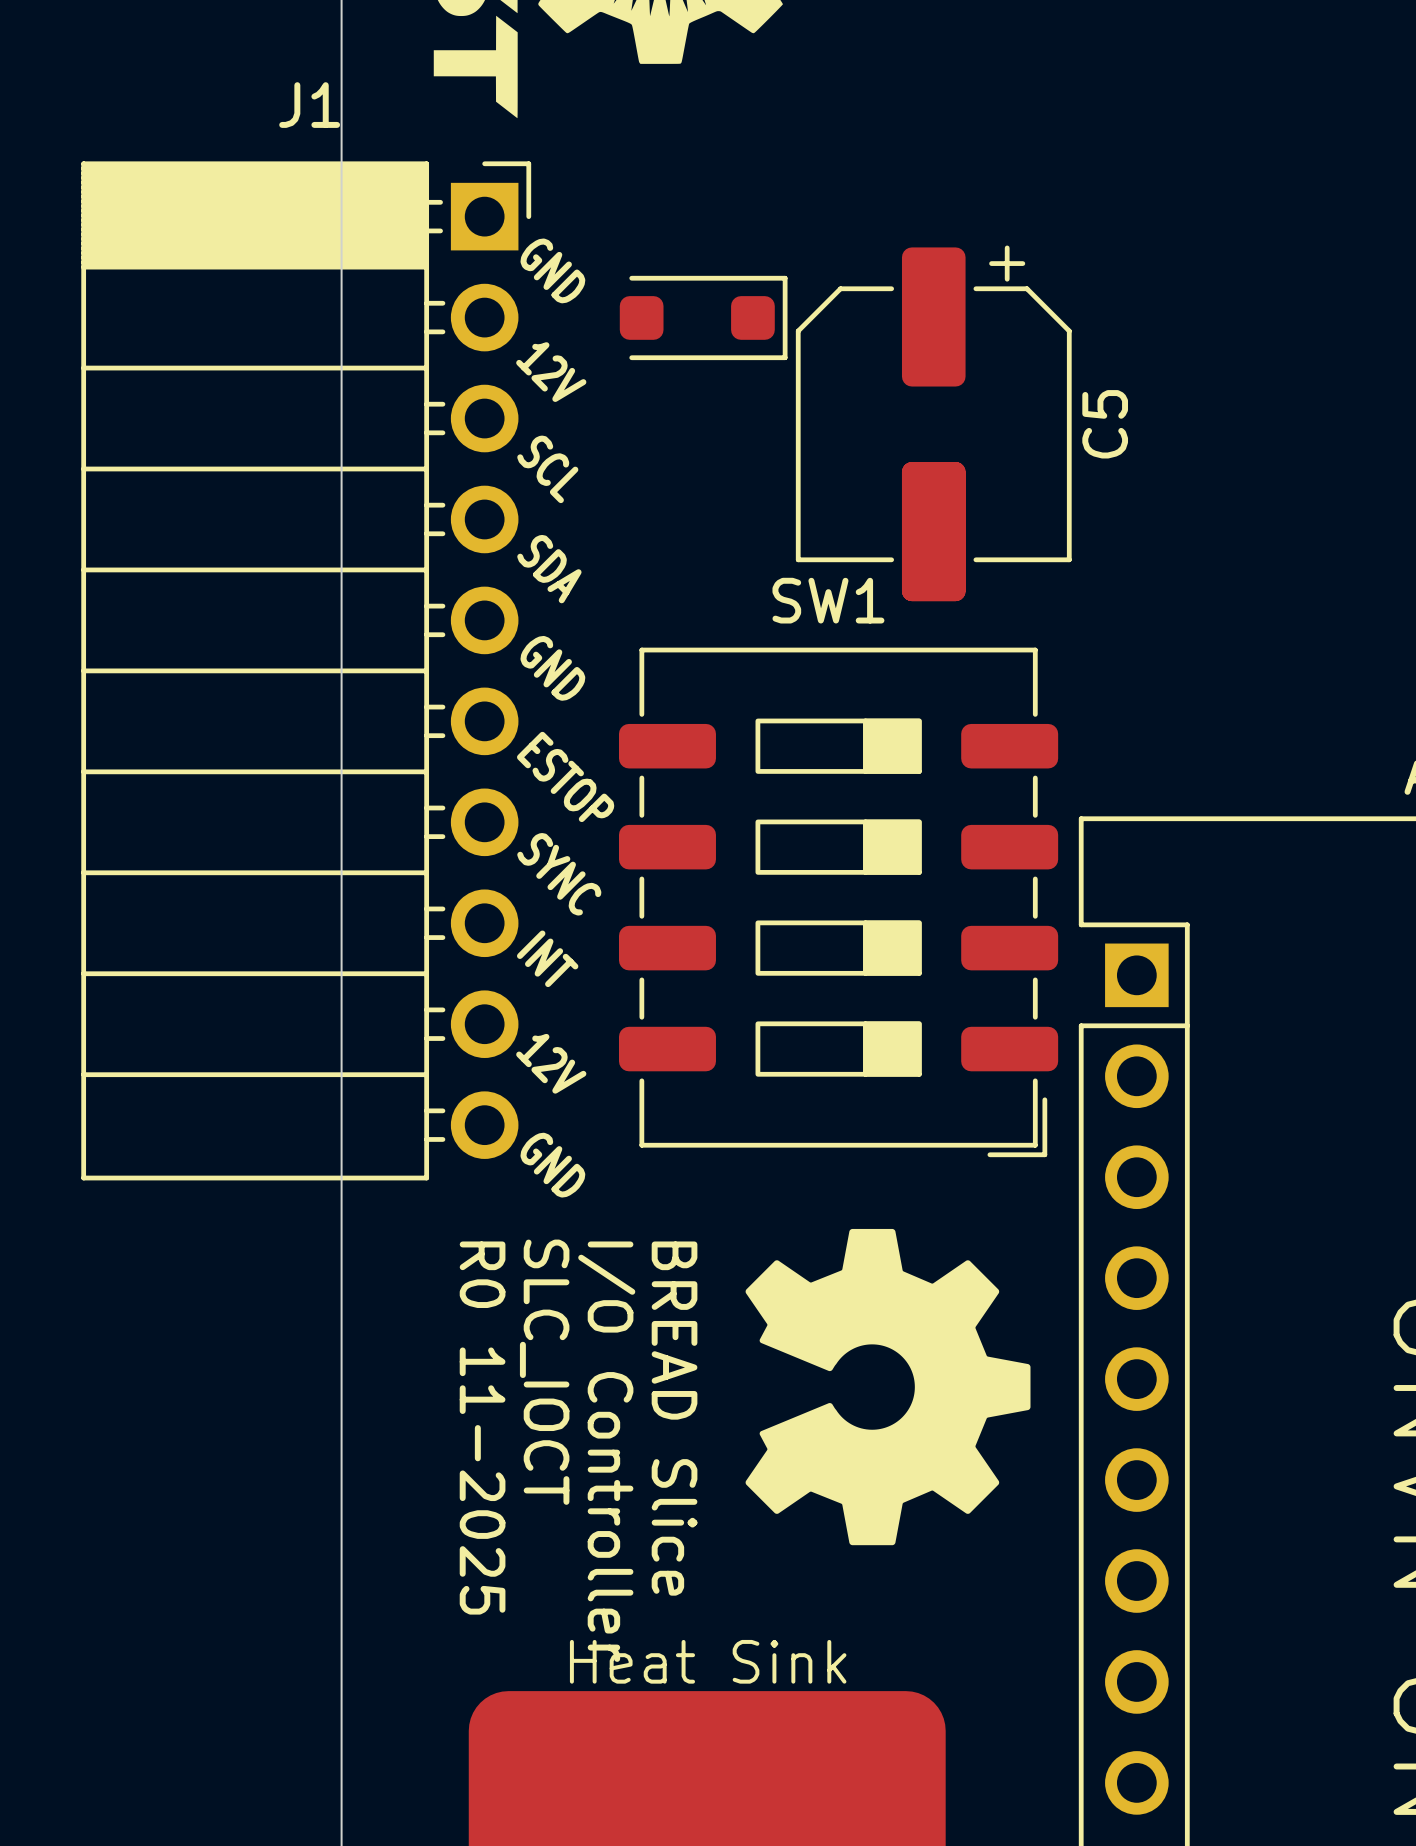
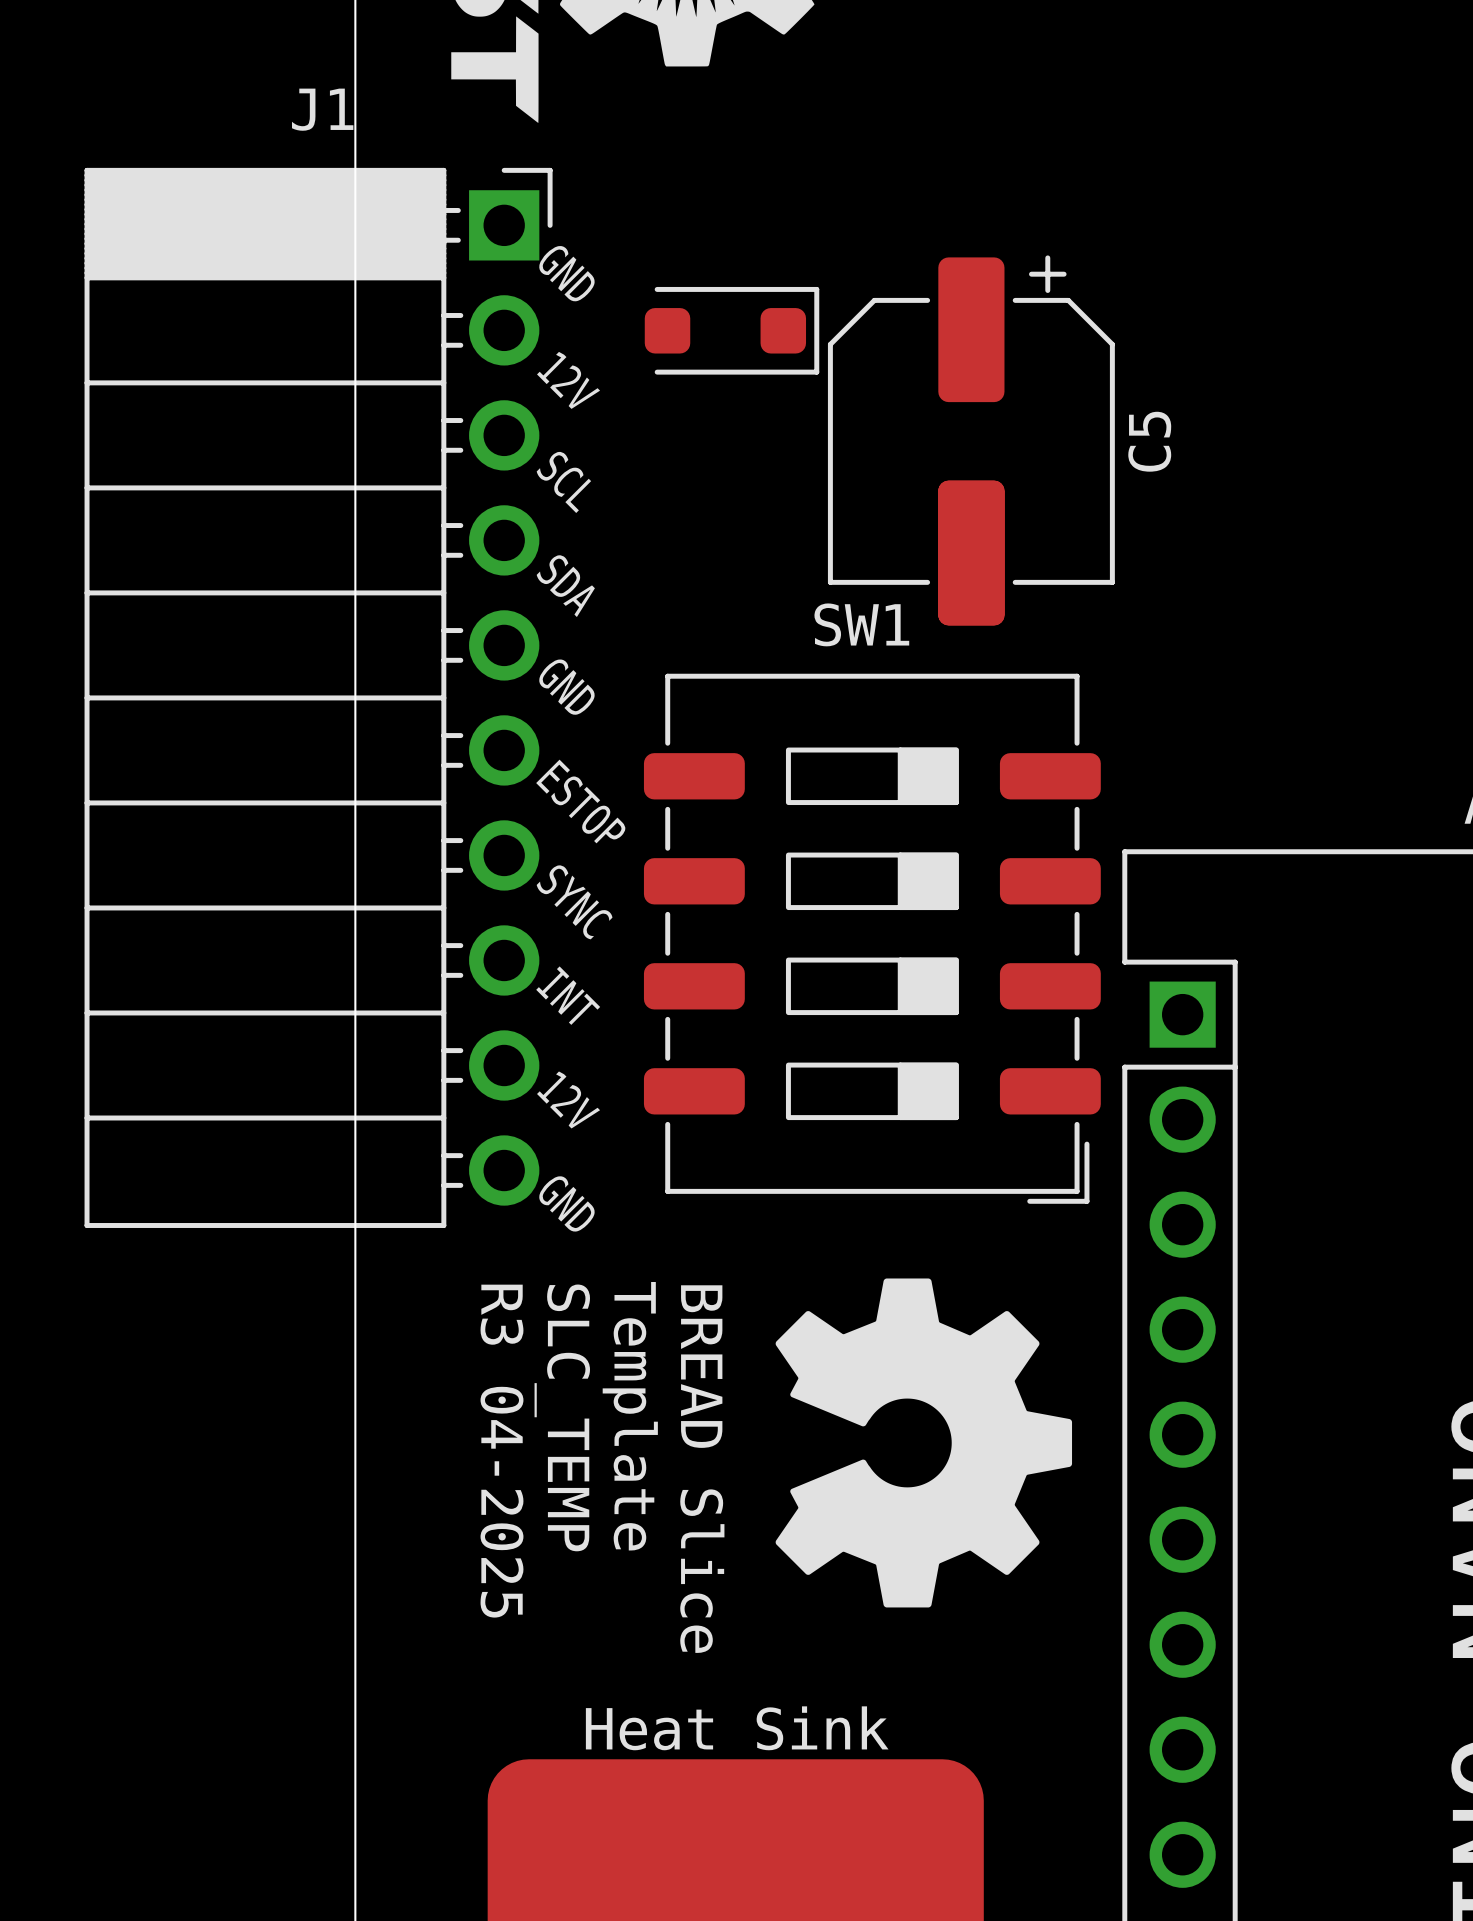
text: SLC_IOCT (544, 1372) -> SLC_TEMP (562, 1417)
text: R0 11-2025 (482, 1428) -> R3 04-2025 (501, 1451)
text: I/O Controller (606, 1451) -> Template (630, 1416)

